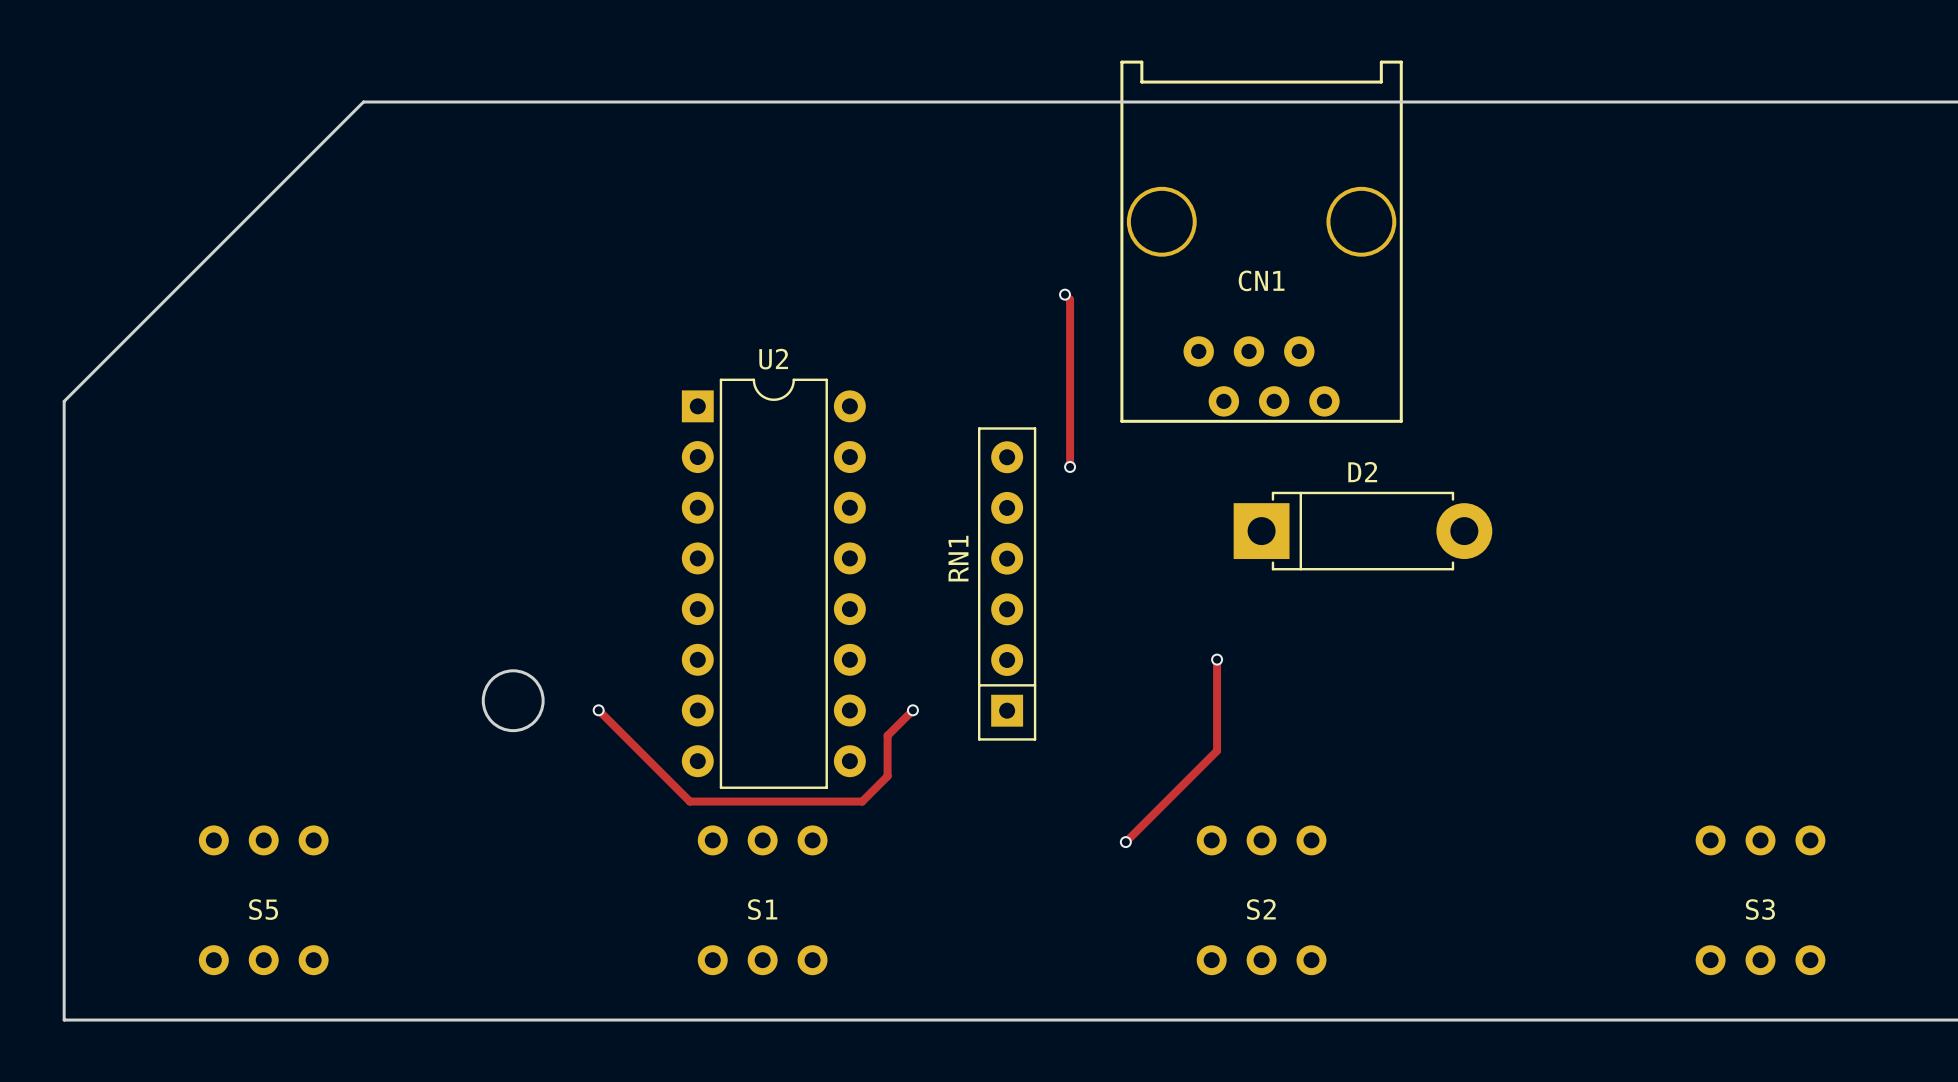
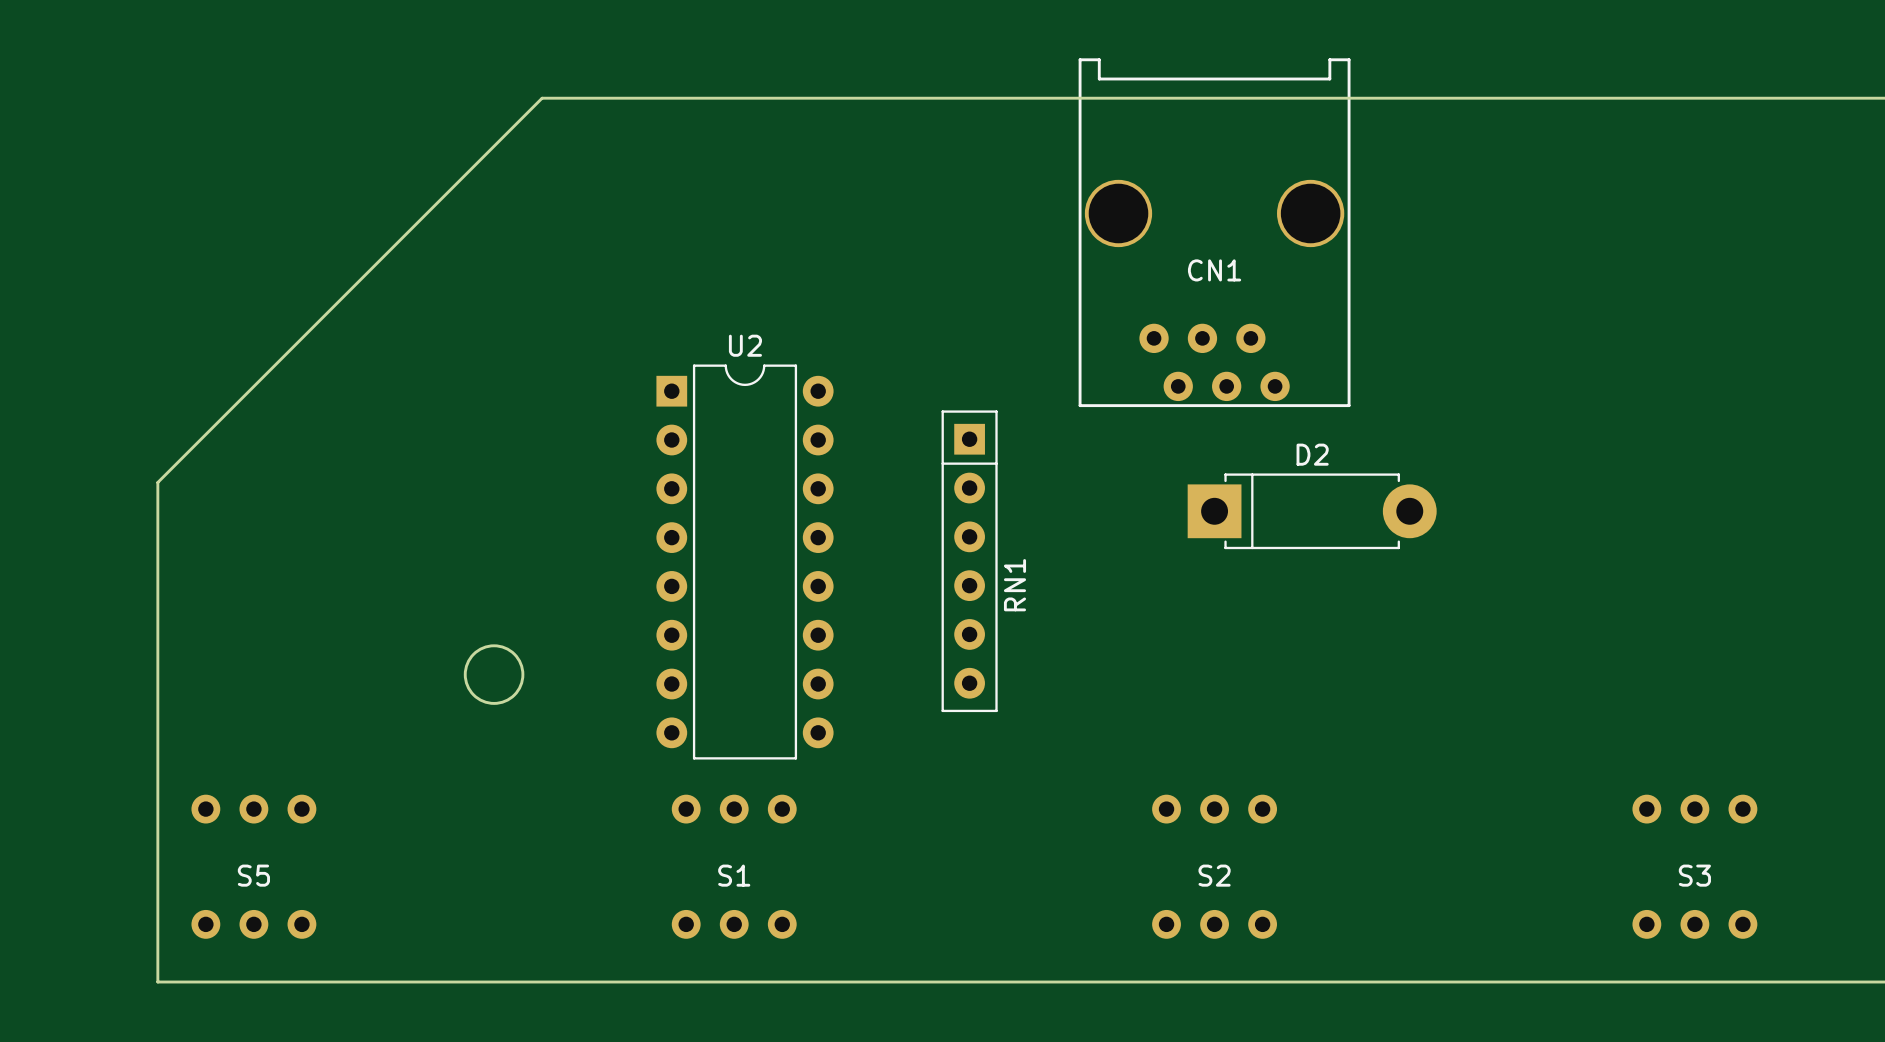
board edge: (563, 102) (363, 102) (64, 401) (64, 1020) (163, 1020) -> (542, 98) (157, 482) (157, 982)
track: (1065, 294) (1070, 299) (1070, 466) -> none
via: (1065, 294) -> none
via: (1070, 466) -> none
RN1 rotation: 0° (1007, 583) -> 180° (969, 561)
track: (1217, 659) (1217, 750) (1125, 842) -> none
via: (1217, 659) -> none
track: (598, 710) (689, 801) (862, 801) (887, 776) (887, 735) (912, 710) -> none
via: (598, 710) -> none
via: (912, 710) -> none
via: (1125, 842) -> none

